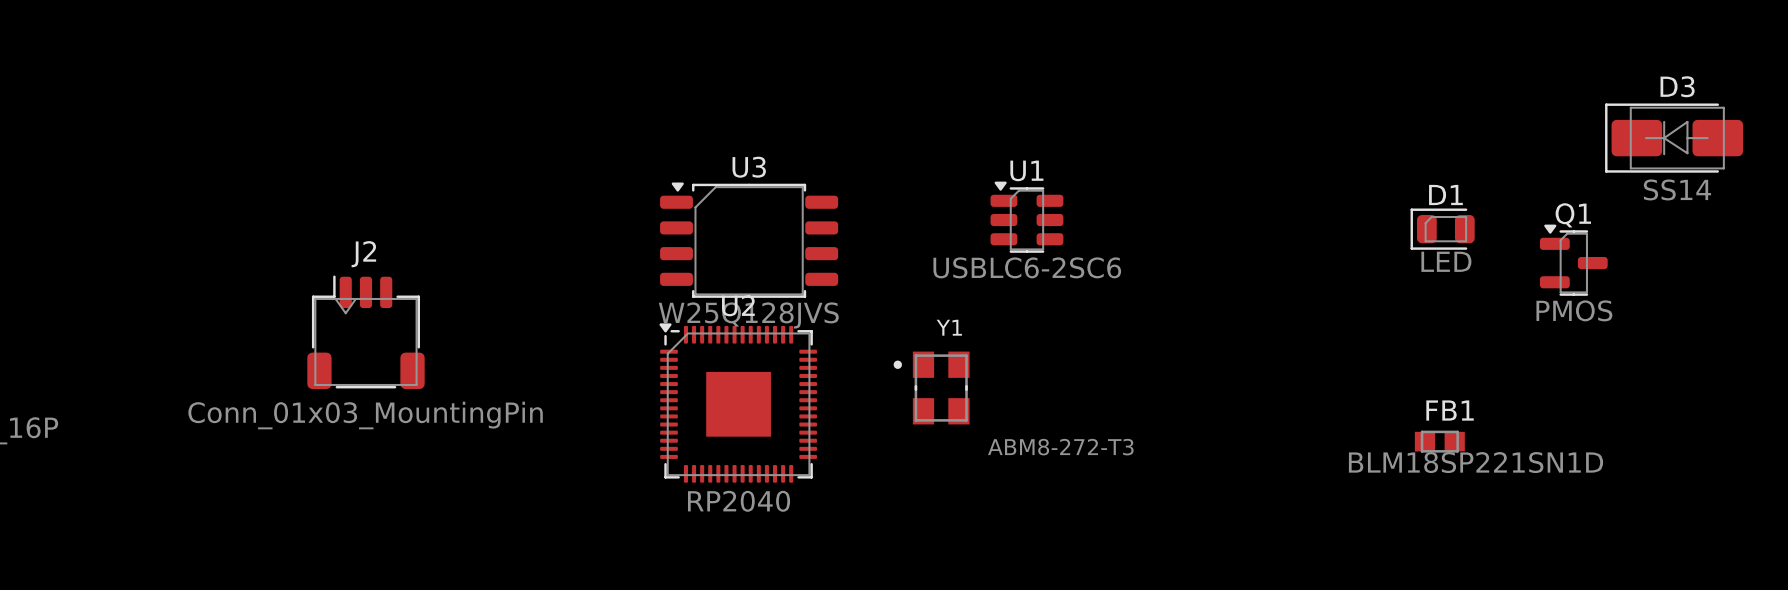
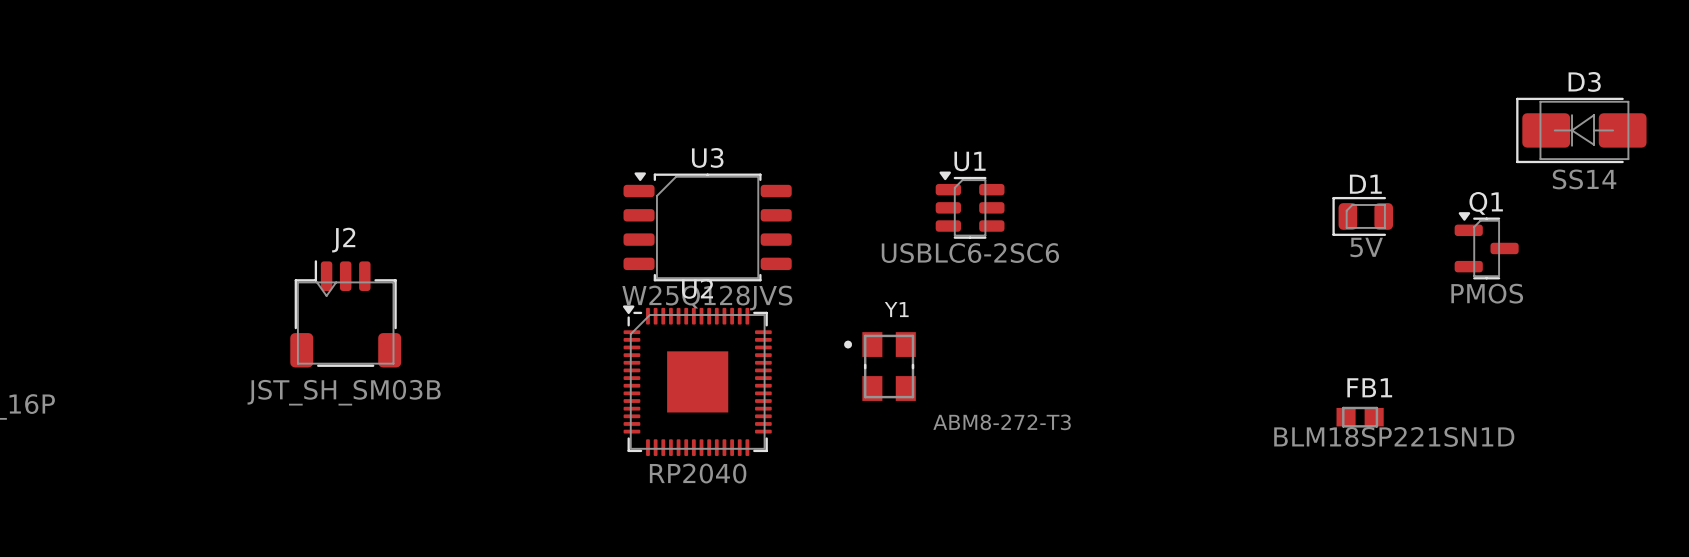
D1 value: LED (1446, 261) -> 5V (1366, 247)
J2 value: Conn_01x03_MountingPin (365, 415) -> JST_SH_SM03B (344, 392)

